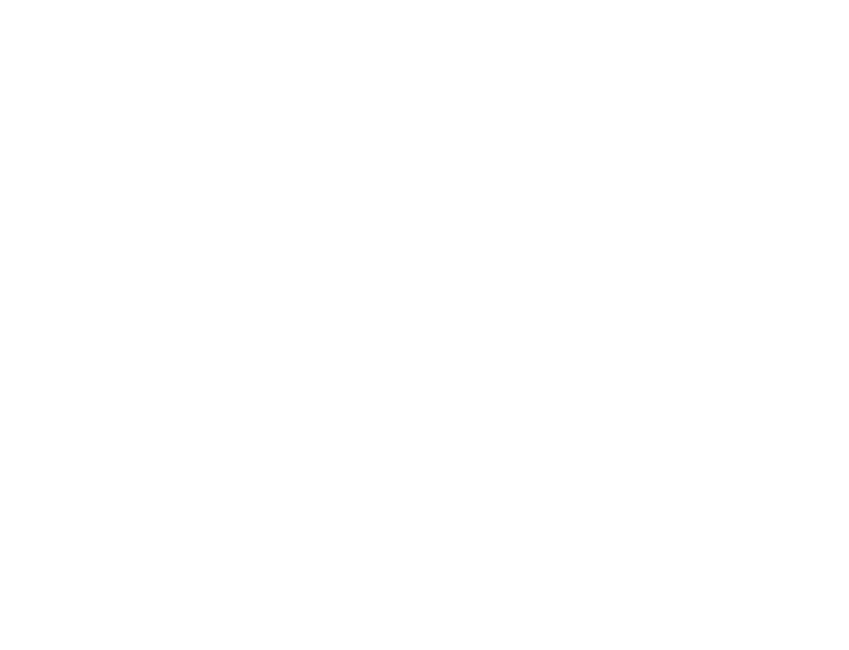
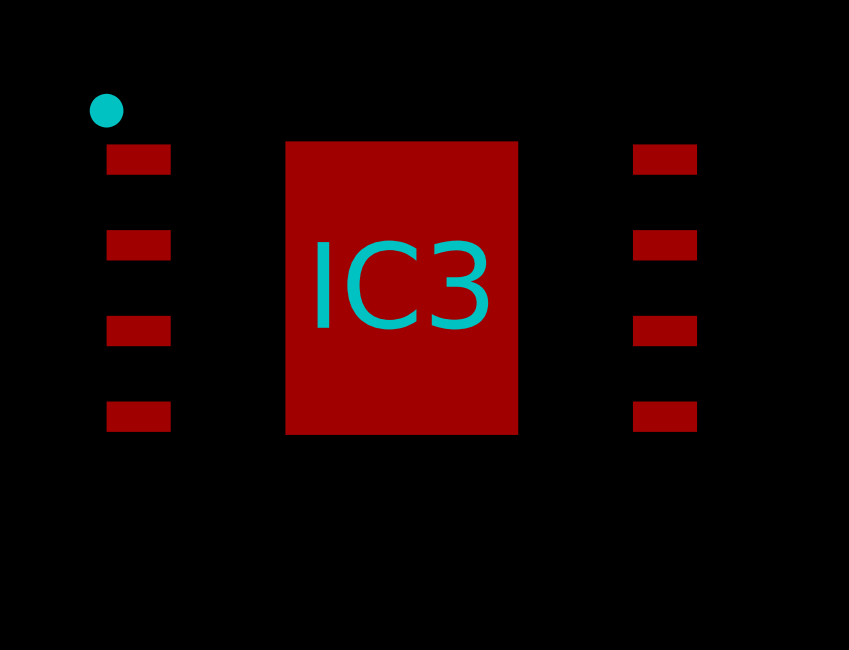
IC3: none -> (393, 264)

